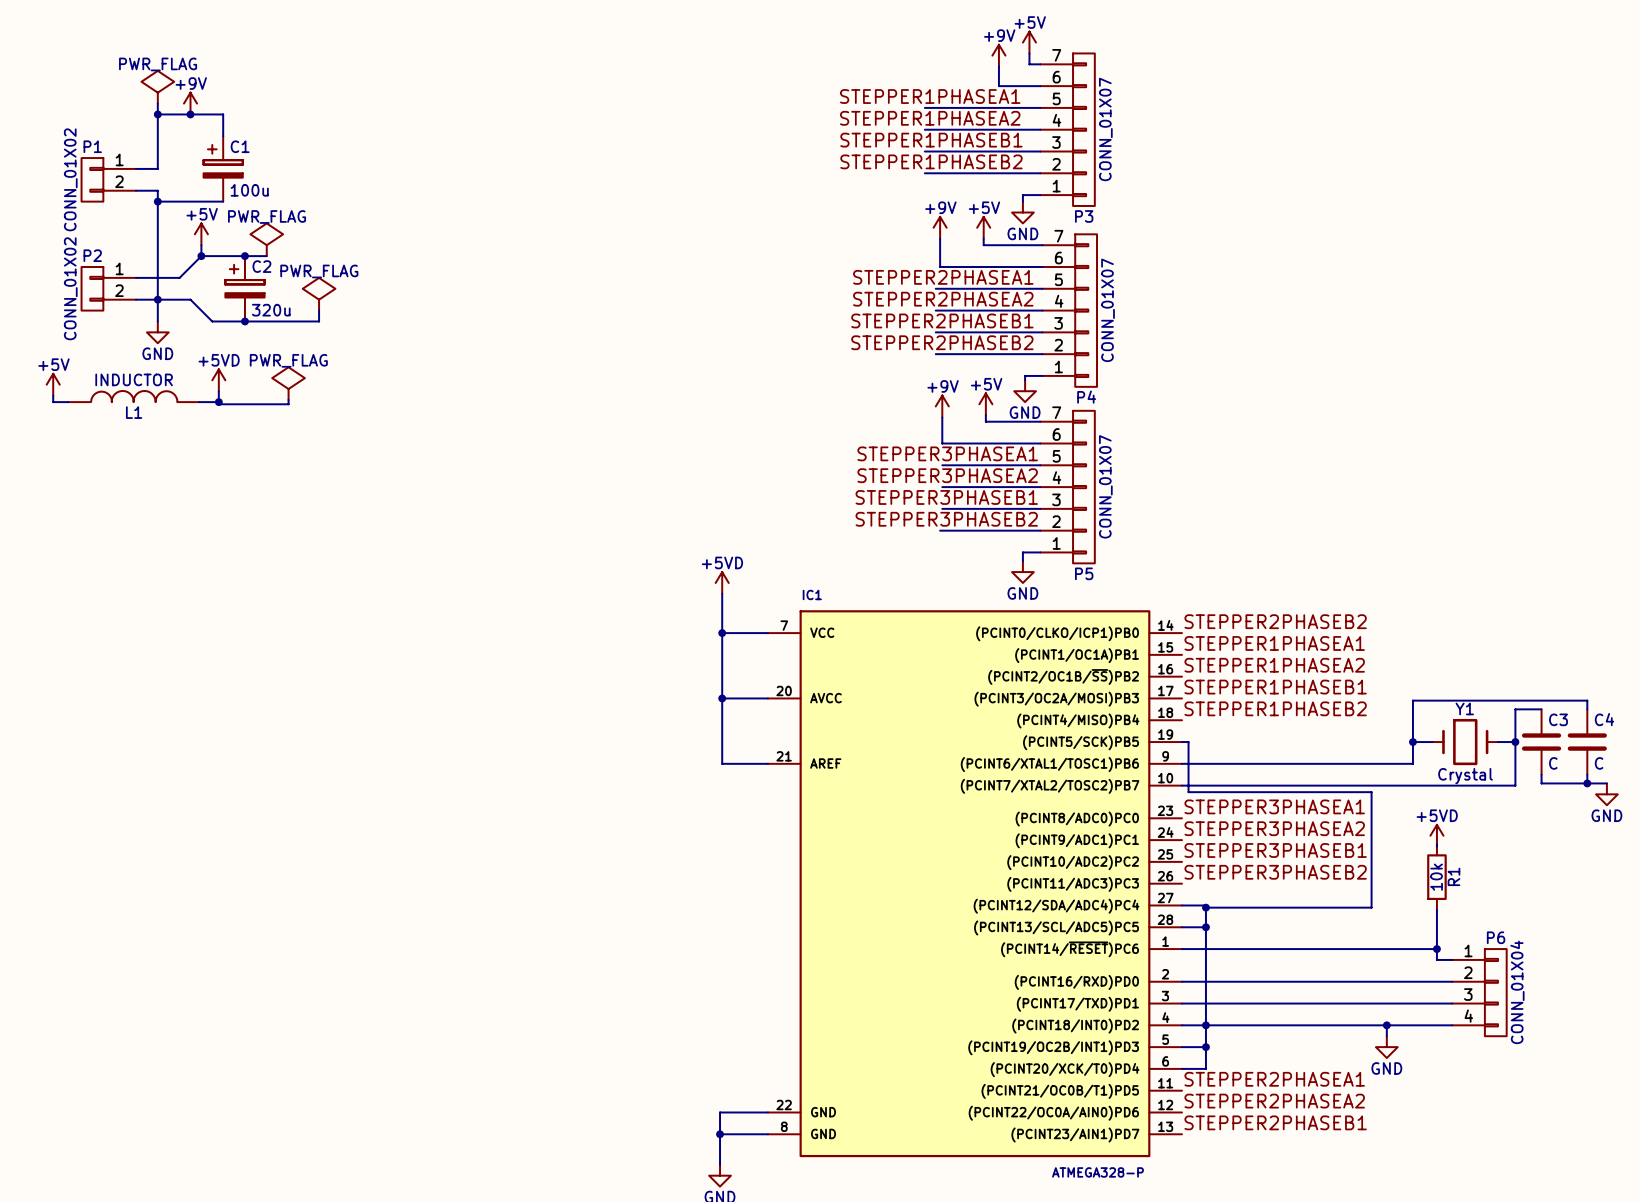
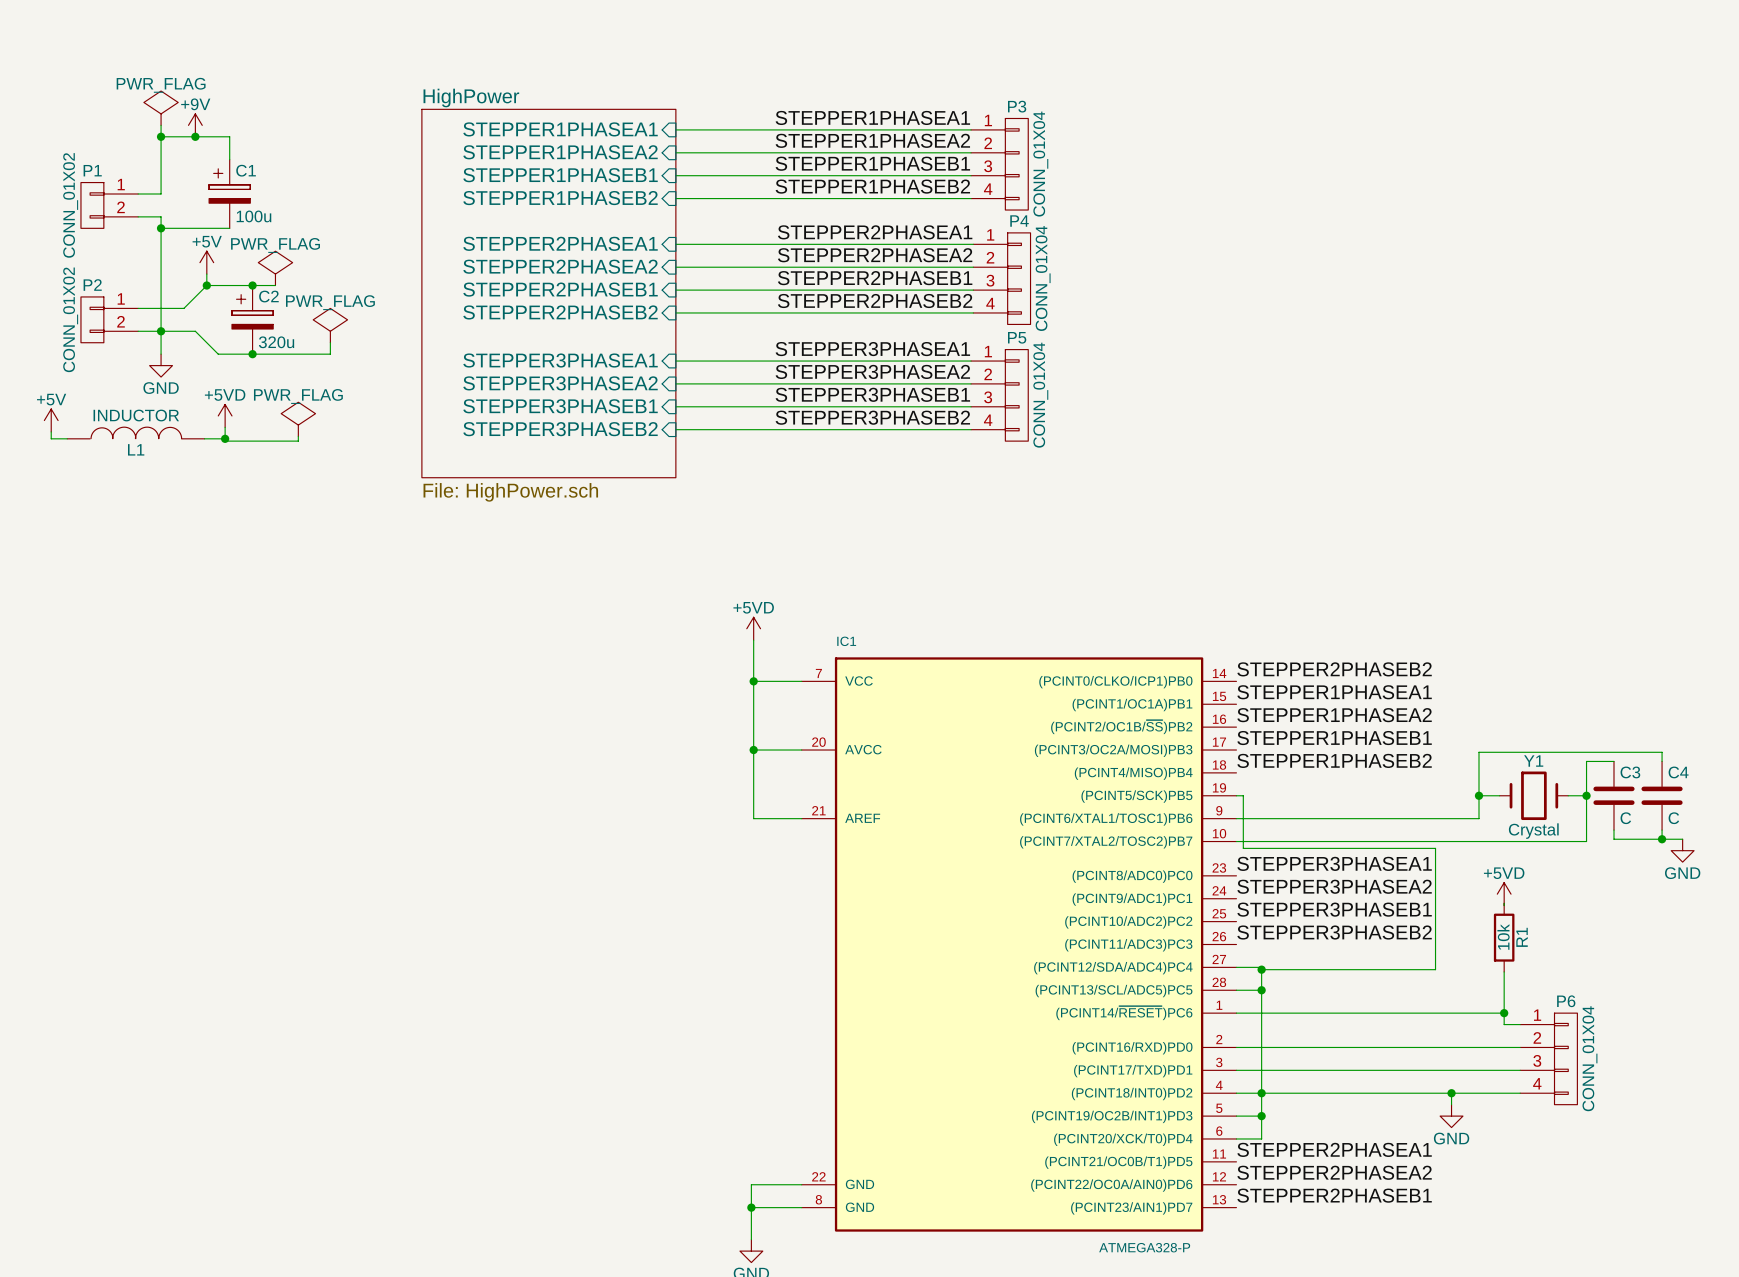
power symbol: +5V (1029, 42) -> none
wire: (1029, 53) (1029, 64) (1040, 64) -> none
P3 symbol: [1040, 53, 1095, 206] -> [971, 118, 1029, 211]
power symbol: +9V (998, 55) -> none
wire: (998, 66) (998, 86) (1040, 86) -> none
label position: STEPPER1PHASEA1 (930, 96) -> STEPPER1PHASEA1 (872, 117)
sheet pin: none -> STEPPER1PHASEA1 (560, 129)
wire: none -> (675, 129) (966, 129)
wire: (929, 107) (1040, 107) -> none
label position: STEPPER1PHASEA2 (930, 118) -> STEPPER1PHASEA2 (872, 140)
sheet pin: none -> STEPPER1PHASEA2 (560, 152)
wire: none -> (675, 152) (966, 152)
wire: (929, 129) (1040, 129) -> none
P3 value: CONN_01X07 (1105, 129) -> CONN_01X04 (1040, 164)
label position: STEPPER1PHASEB1 (931, 140) -> STEPPER1PHASEB1 (872, 163)
sheet pin: none -> STEPPER1PHASEB1 (560, 175)
wire: none -> (675, 175) (966, 175)
wire: (929, 151) (1040, 151) -> none
label position: STEPPER1PHASEB2 (931, 161) -> STEPPER1PHASEB2 (872, 186)
sheet pin: none -> STEPPER1PHASEB2 (560, 198)
wire: none -> (675, 198) (966, 198)
wire: (929, 173) (1040, 173) -> none
wire: (1040, 195) (1022, 195) (1022, 201) -> none
power symbol: GND (1022, 212) -> none
sheet pin: none -> STEPPER2PHASEA1 (560, 243)
wire: none -> (675, 244) (973, 244)
P3 name position: P3 (1084, 216) -> P3 (1017, 106)
power symbol: +9V (940, 227) -> none
power symbol: +5V (983, 227) -> none
P4 symbol: [1042, 234, 1098, 387] -> [973, 232, 1031, 325]
sheet pin: none -> STEPPER2PHASEA2 (560, 266)
wire: none -> (675, 267) (973, 267)
wire: (940, 238) (940, 267) (1042, 267) -> none
wire: (983, 238) (983, 245) (1042, 245) -> none
sheet pin: none -> STEPPER2PHASEB1 (560, 289)
wire: none -> (675, 290) (973, 290)
sheet HighPower: none -> File: HighPower.sch (548, 293)
label position: STEPPER2PHASEA1 (943, 277) -> STEPPER2PHASEA1 (875, 232)
sheet pin: none -> STEPPER2PHASEB2 (560, 312)
wire: none -> (675, 312) (973, 312)
wire: (935, 288) (1042, 288) -> none
label position: STEPPER2PHASEA2 (943, 299) -> STEPPER2PHASEA2 (875, 255)
wire: (935, 310) (1042, 310) -> none
P4 value: CONN_01X07 (1108, 310) -> CONN_01X04 (1043, 278)
label position: STEPPER2PHASEB1 (942, 320) -> STEPPER2PHASEB1 (875, 278)
sheet pin: none -> STEPPER3PHASEA1 (560, 360)
wire: none -> (675, 361) (971, 361)
wire: (935, 332) (1042, 332) -> none
label position: STEPPER2PHASEB2 (942, 342) -> STEPPER2PHASEB2 (875, 301)
sheet pin: none -> STEPPER3PHASEA2 (560, 383)
wire: none -> (675, 383) (971, 383)
wire: (935, 354) (1042, 354) -> none
sheet pin: none -> STEPPER3PHASEB1 (560, 406)
wire: none -> (675, 406) (971, 406)
wire: (1042, 375) (1025, 375) (1025, 380) -> none
power symbol: GND (1025, 391) -> none
sheet pin: none -> STEPPER3PHASEB2 (560, 429)
wire: none -> (675, 429) (971, 429)
P4 name position: P4 (1086, 397) -> P4 (1019, 221)
power symbol: +5V (985, 404) -> none
power symbol: +9V (942, 406) -> none
P5 symbol: [1040, 410, 1095, 564] -> [971, 349, 1029, 442]
wire: (985, 415) (985, 421) (1040, 421) -> none
wire: (942, 417) (942, 443) (1040, 443) -> none
label position: STEPPER3PHASEA1 (947, 453) -> STEPPER3PHASEA1 (872, 349)
wire: (942, 465) (1040, 465) -> none
label position: STEPPER3PHASEA2 (947, 475) -> STEPPER3PHASEA2 (872, 371)
P5 value: CONN_01X07 (1105, 486) -> CONN_01X04 (1040, 395)
wire: (942, 487) (1040, 487) -> none
label position: STEPPER3PHASEB1 (946, 497) -> STEPPER3PHASEB1 (872, 394)
wire: (942, 508) (1040, 508) -> none
label position: STEPPER3PHASEB2 (946, 519) -> STEPPER3PHASEB2 (872, 417)
wire: (940, 530) (1040, 530) -> none
wire: (1040, 552) (1022, 552) (1022, 561) -> none
power symbol: GND (1022, 572) -> none
P5 name position: P5 (1084, 573) -> P5 (1017, 337)

